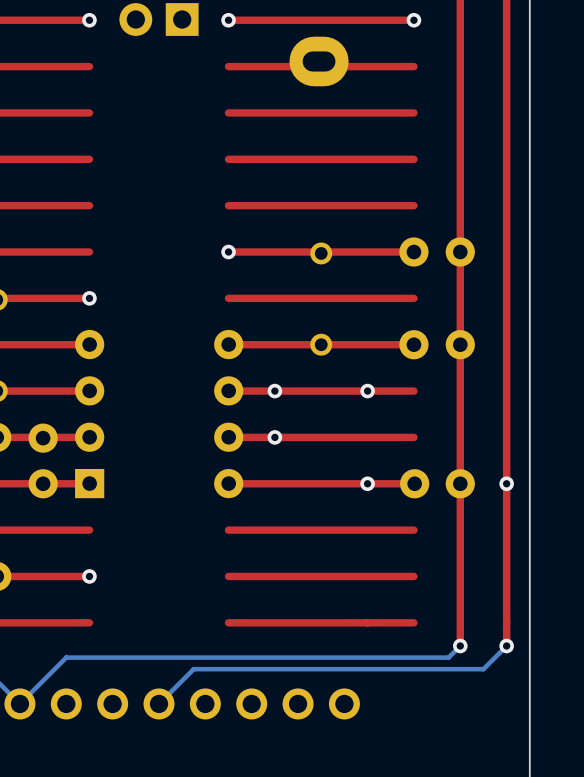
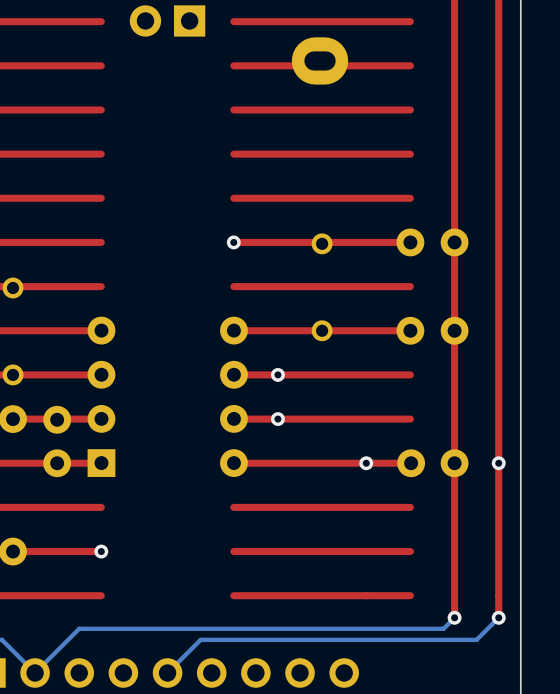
via: (89, 20) -> none
via: (228, 20) -> none
via: (413, 20) -> none
via: (89, 298) -> none
via: (367, 391) -> none

